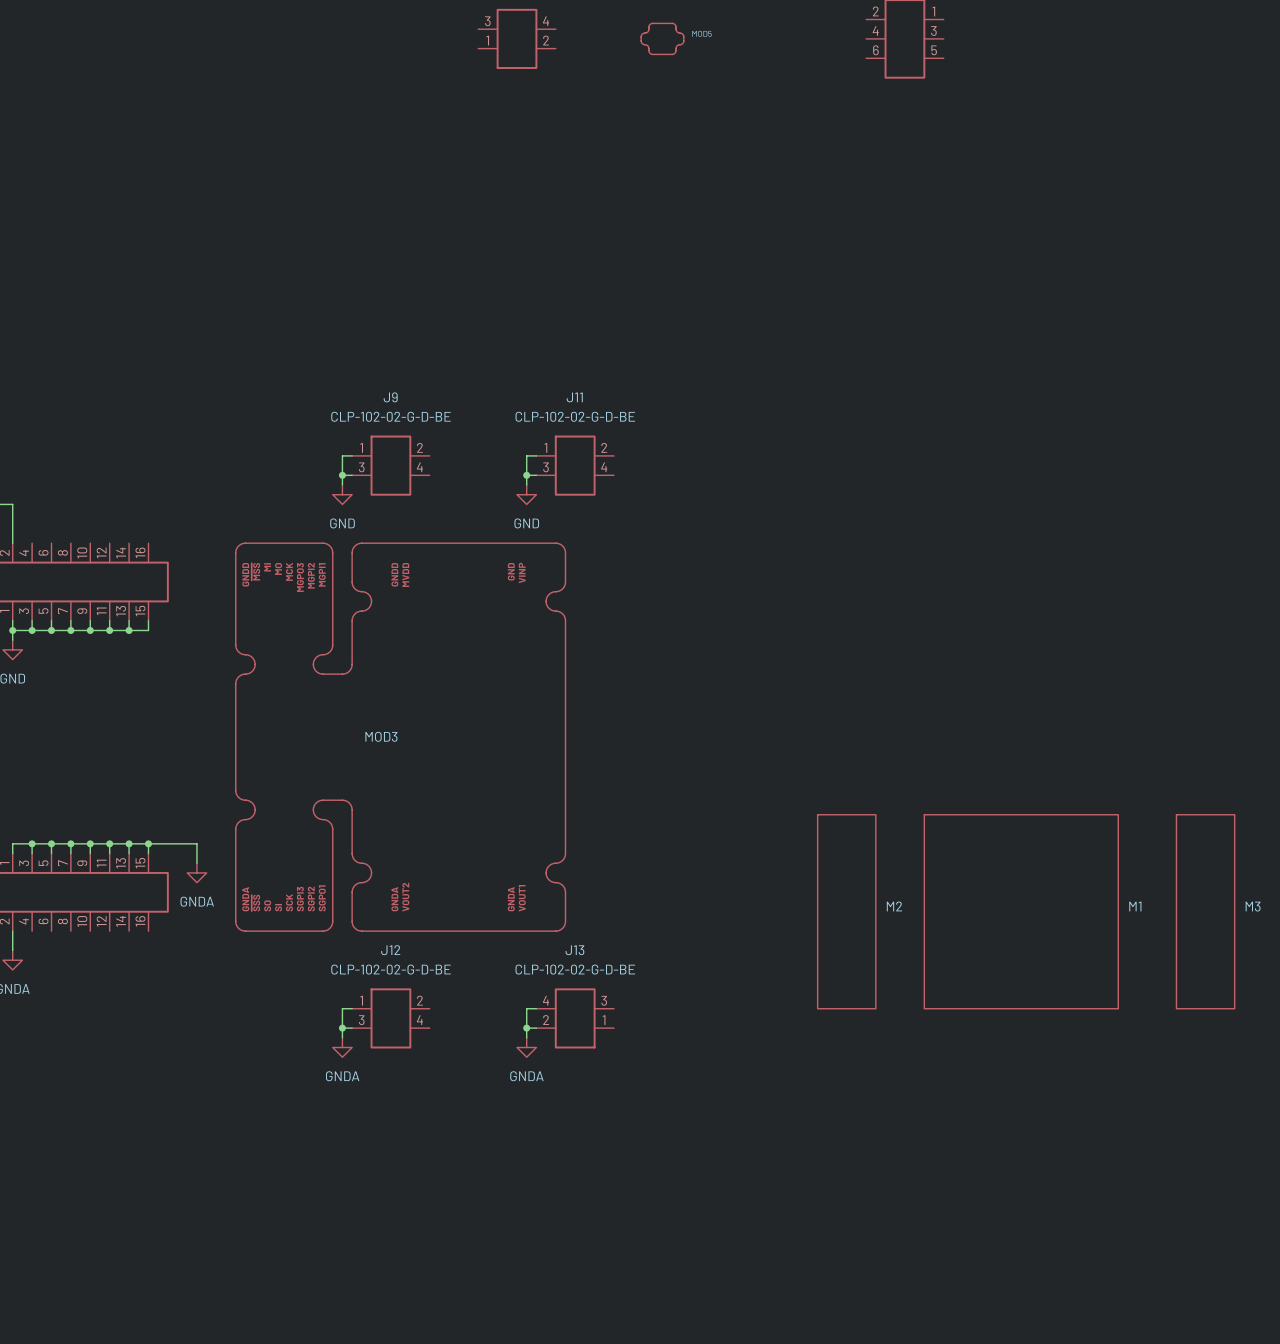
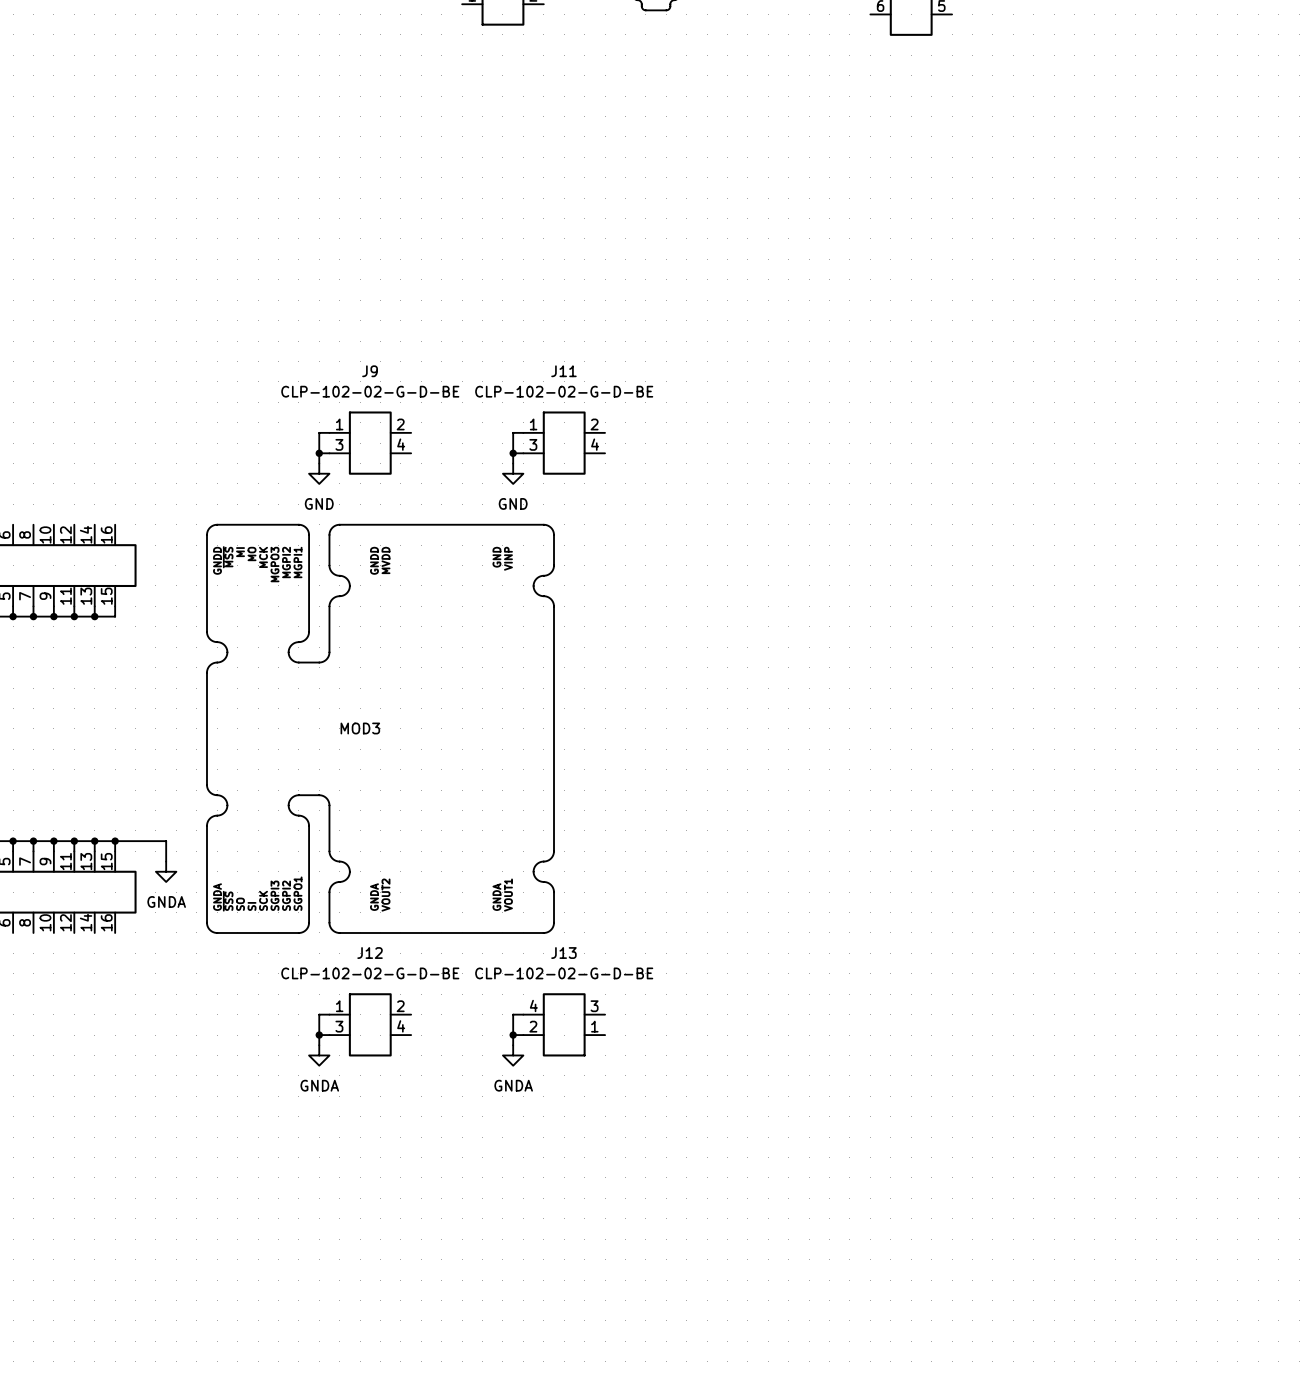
M2: (846, 911) -> none
M1: (1021, 911) -> none
M3: (1205, 911) -> none

